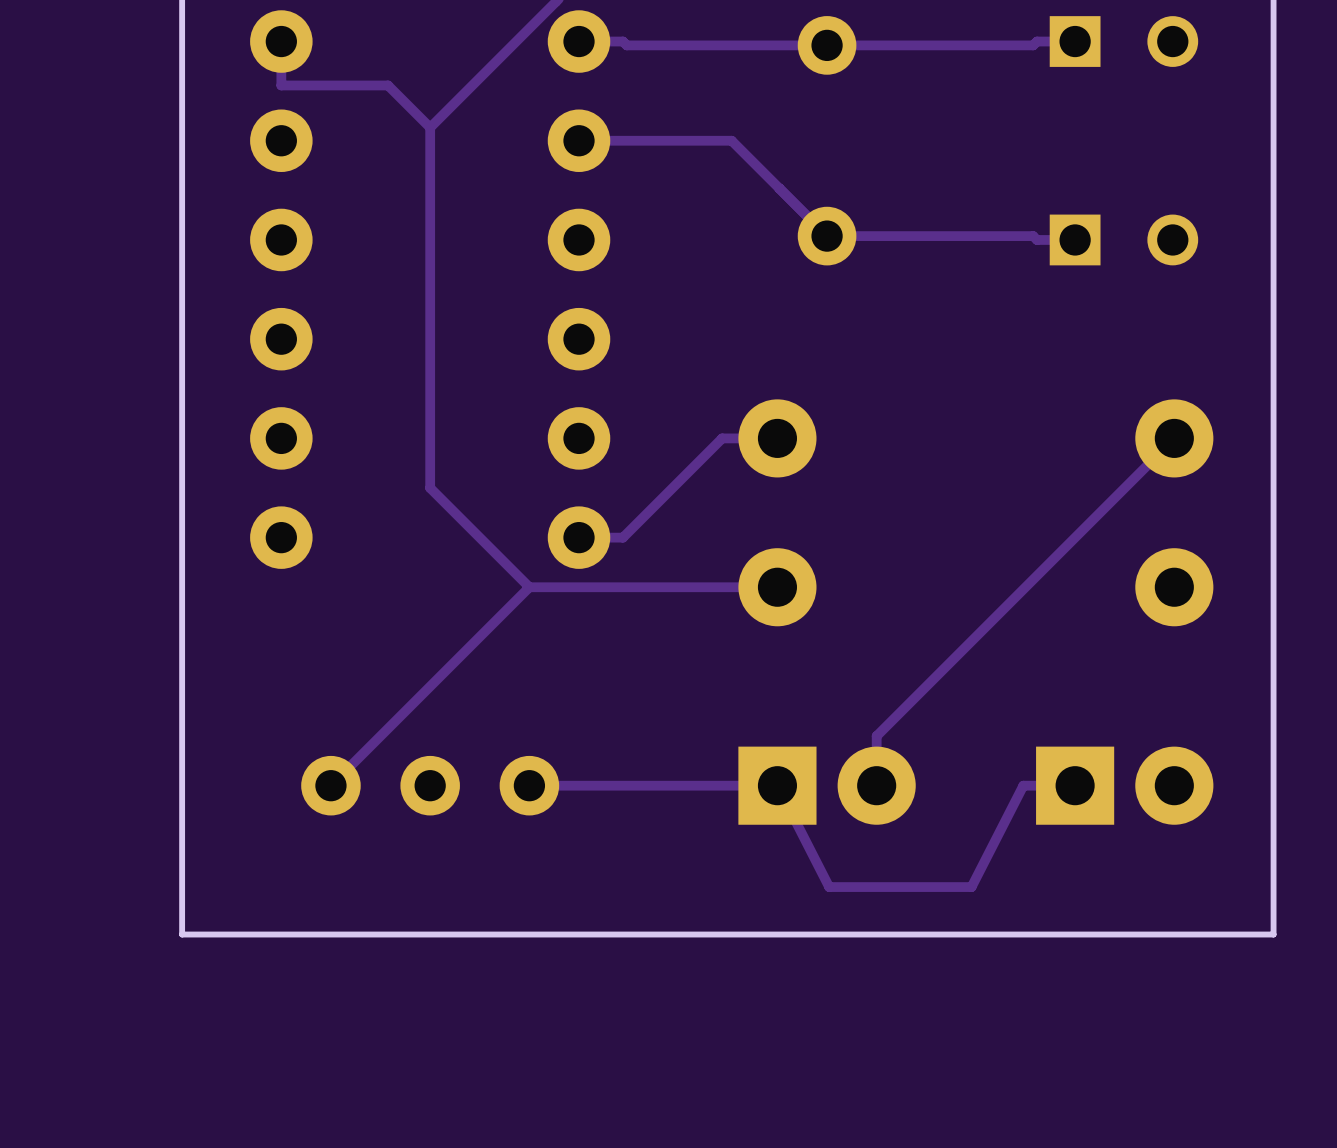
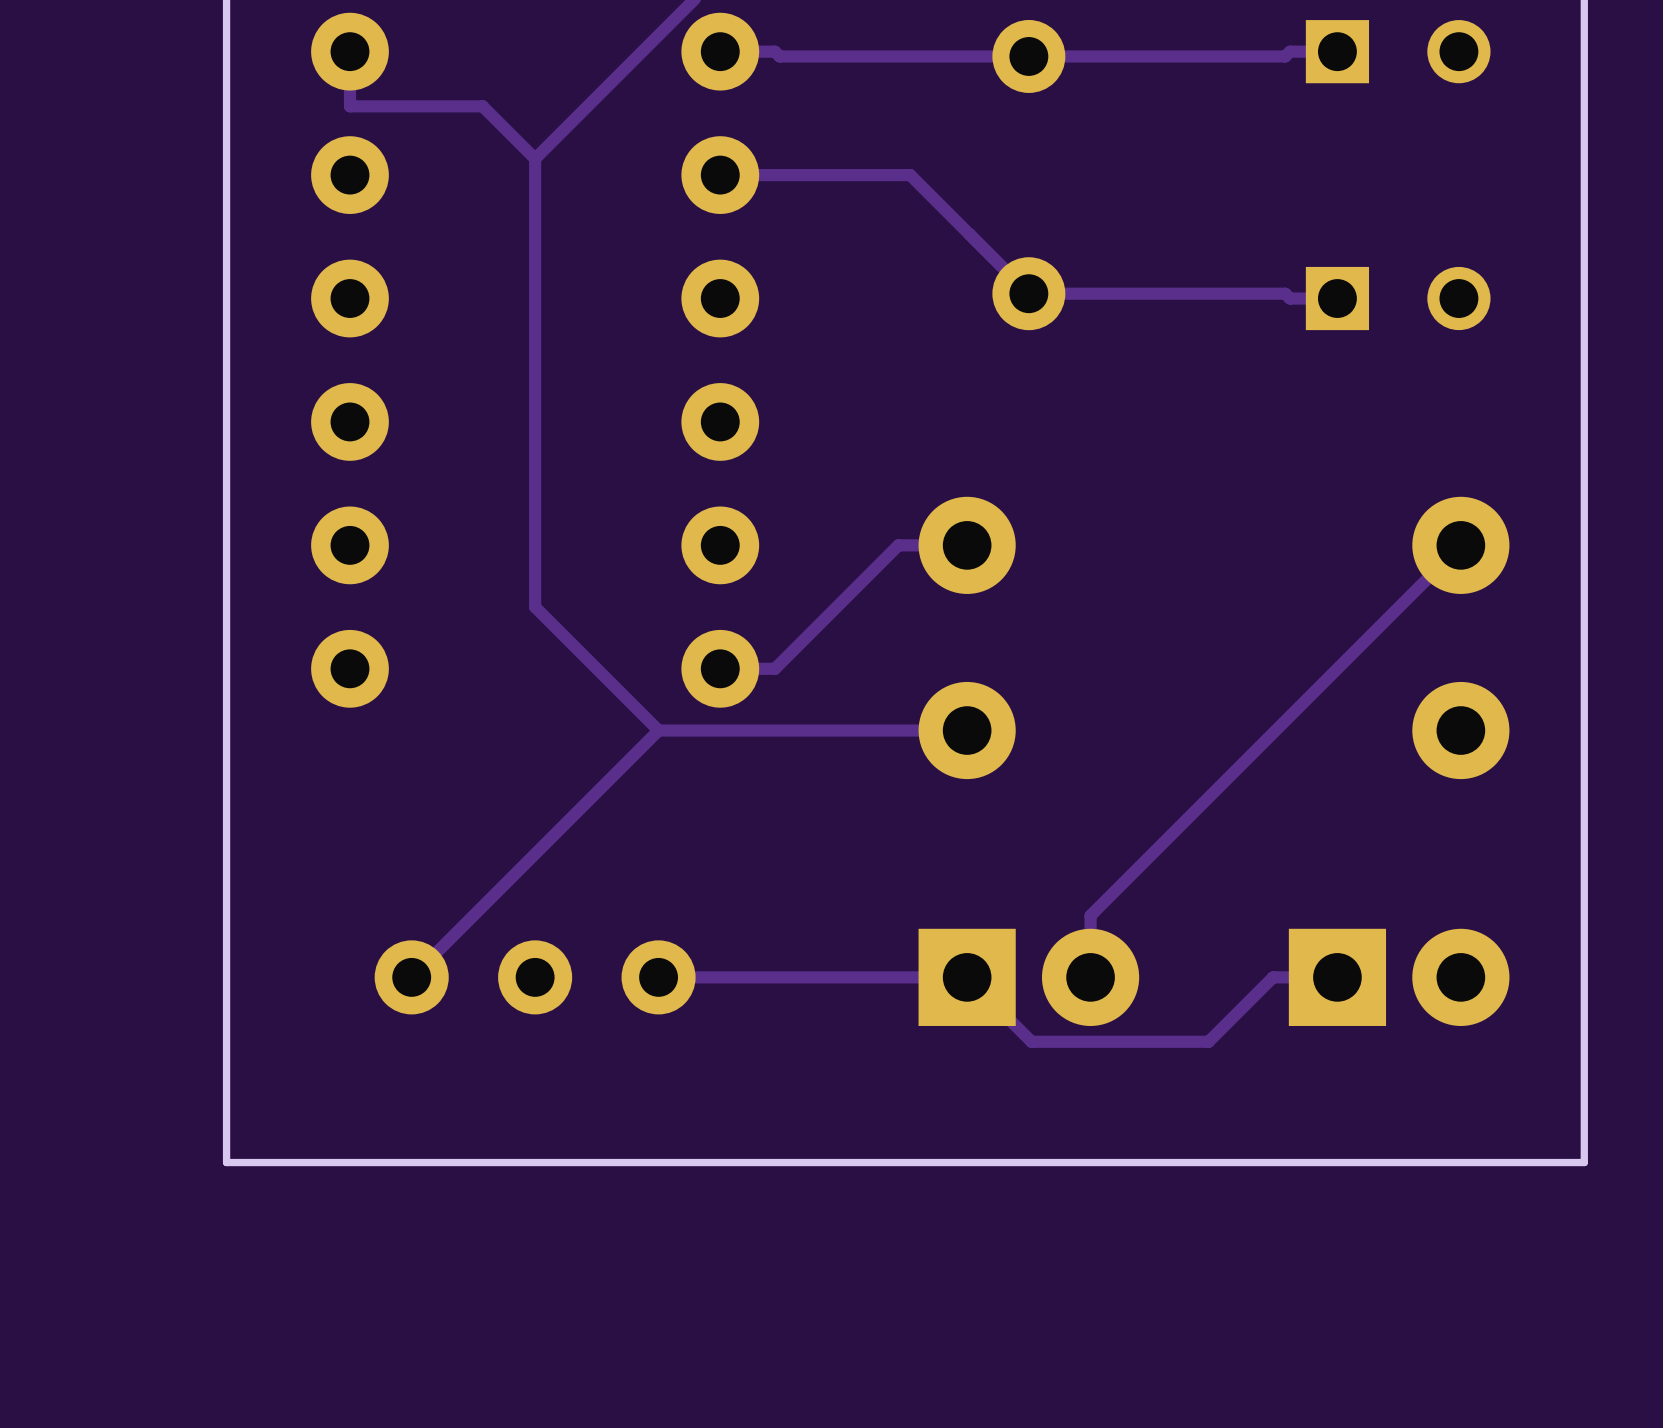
track: (1023, 785) (971, 887) (829, 887) (777, 785) -> (1273, 977) (1208, 1041) (1031, 1041) (967, 977)

